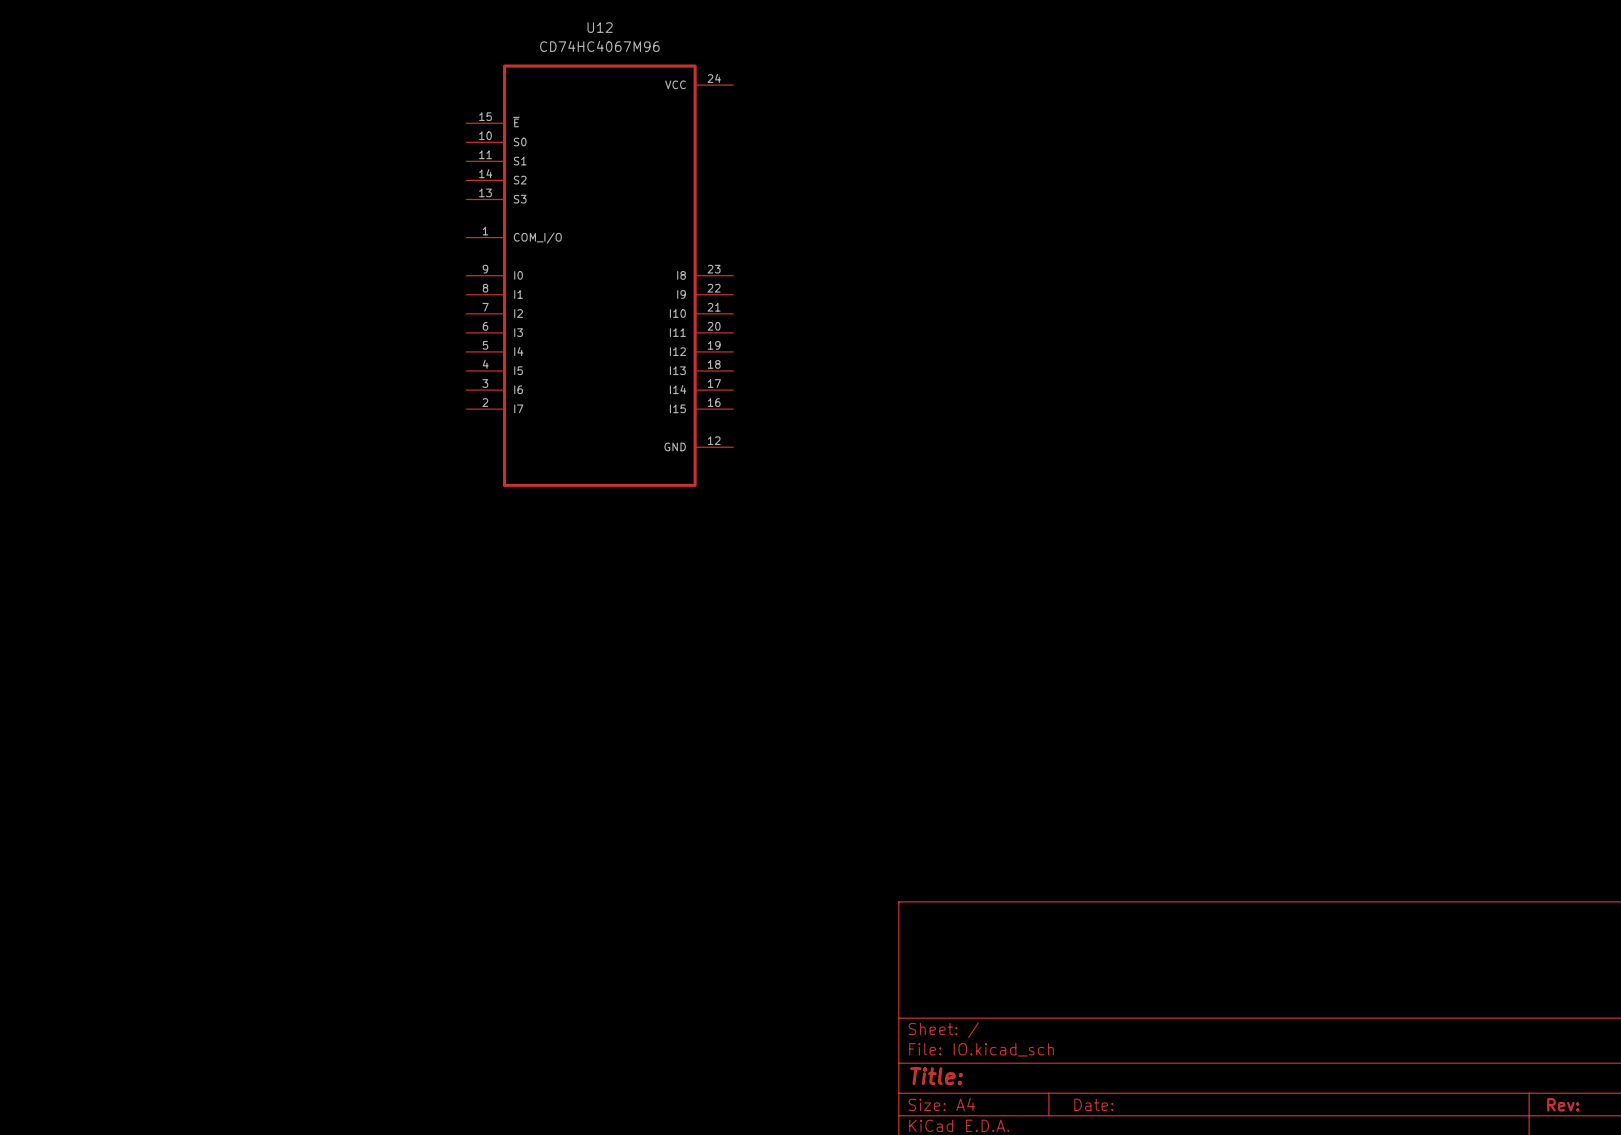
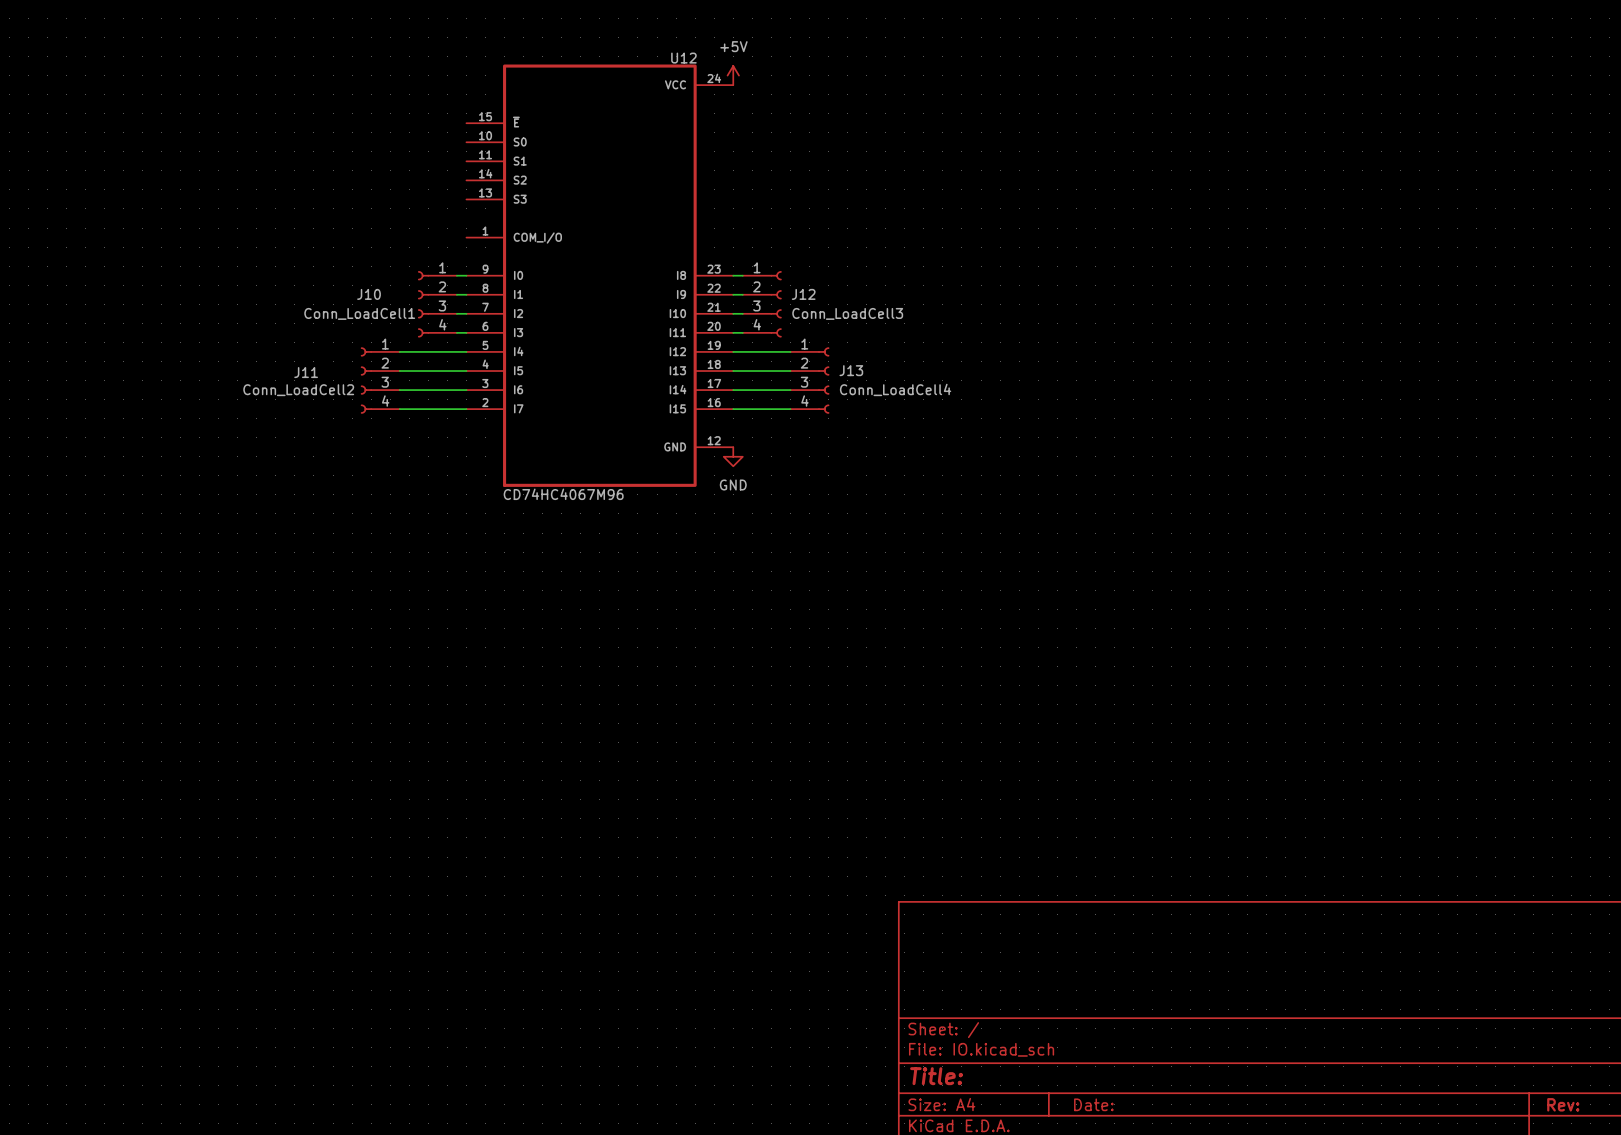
U12 name position: U12 (600, 27) -> U12 (683, 58)
U12 value position: CD74HC4067M96 (599, 46) -> CD74HC4067M96 (563, 494)
power symbol: none -> +5V (733, 75)
wire: none -> (456, 275) (466, 275)
wire: none -> (733, 275) (742, 275)
wire: none -> (456, 294) (466, 294)
wire: none -> (733, 294) (742, 294)
J10: none -> Conn_LoadCell1 (437, 304)
J12: none -> Conn_LoadCell3 (762, 304)
wire: none -> (456, 313) (466, 313)
wire: none -> (733, 313) (742, 313)
wire: none -> (456, 332) (466, 332)
wire: none -> (733, 332) (742, 332)
wire: none -> (399, 351) (466, 351)
wire: none -> (733, 351) (790, 351)
wire: none -> (399, 371) (466, 371)
wire: none -> (733, 371) (790, 371)
J11: none -> Conn_LoadCell2 (380, 380)
J13: none -> Conn_LoadCell4 (809, 380)
wire: none -> (399, 390) (466, 390)
wire: none -> (733, 390) (790, 390)
wire: none -> (399, 409) (466, 409)
wire: none -> (733, 409) (790, 409)
power symbol: none -> GND (733, 456)

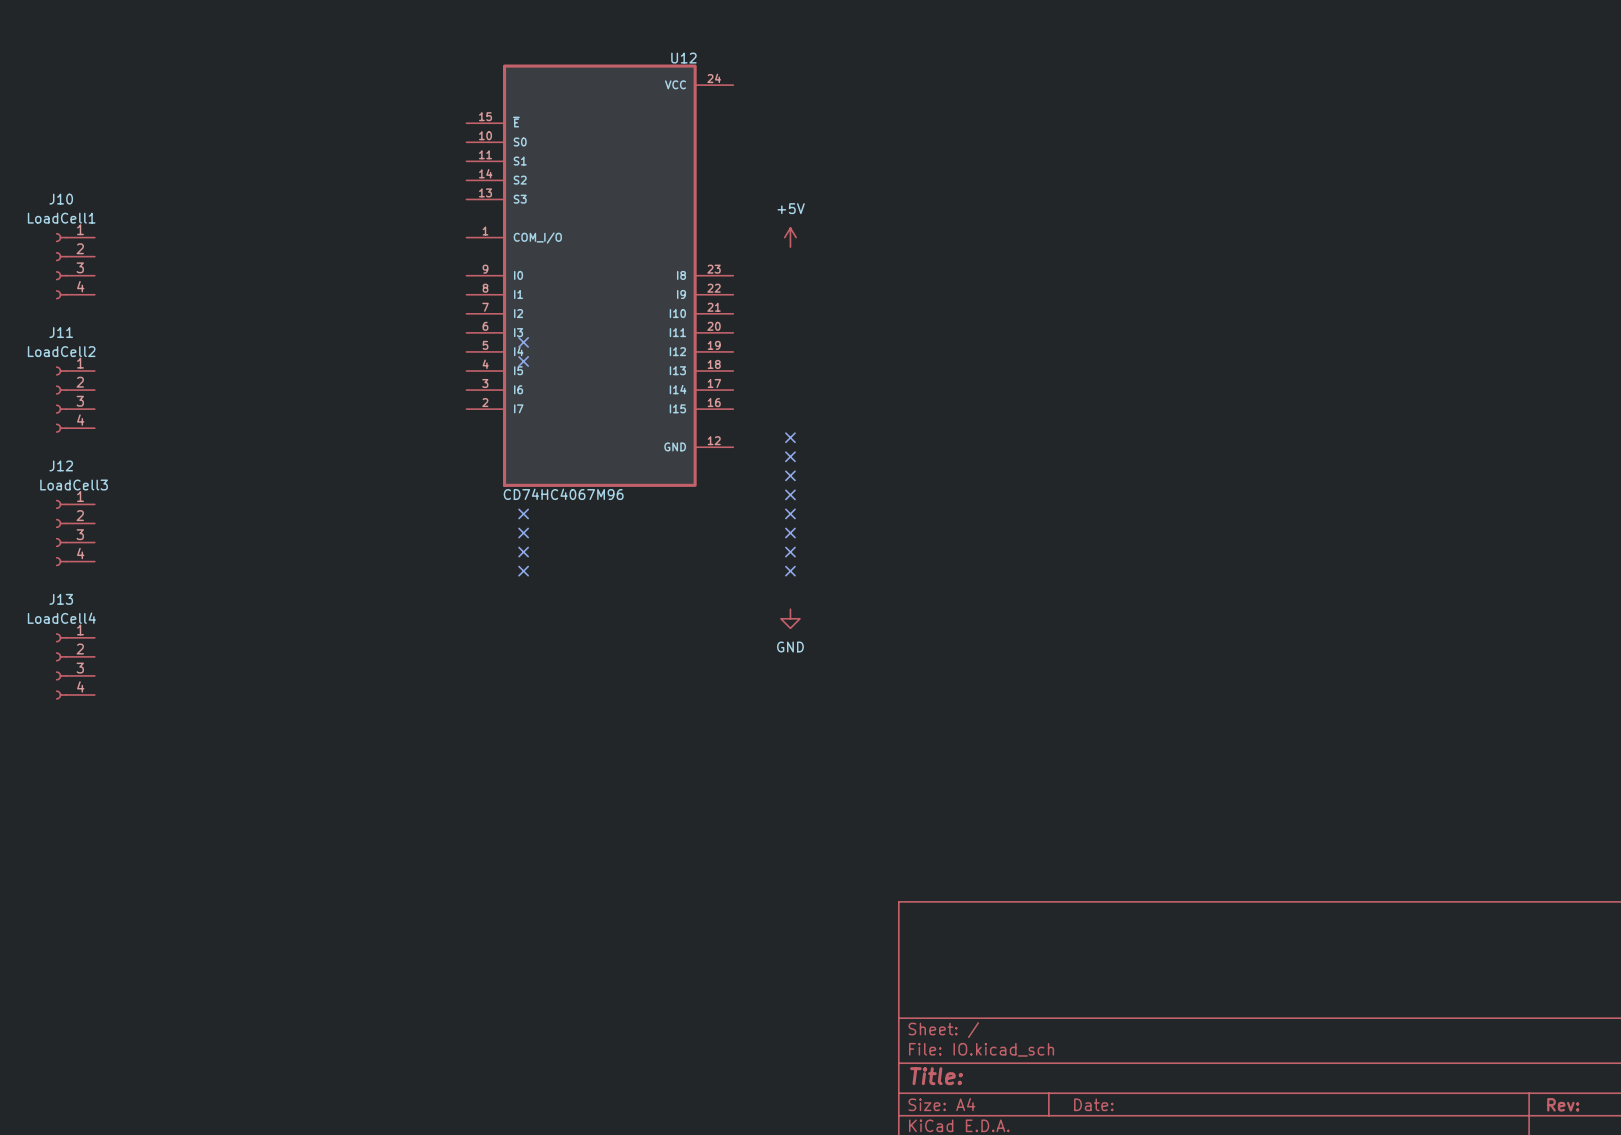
power symbol position: +5V (733, 75) -> +5V (790, 237)
wire: (456, 275) (466, 275) -> none
wire: (733, 275) (742, 275) -> none
J10 name position: J10 (369, 294) -> J10 (61, 199)
wire: (456, 294) (466, 294) -> none
wire: (733, 294) (742, 294) -> none
J12 name position: J12 (803, 294) -> J12 (61, 465)
J10 position: (437, 304) -> (75, 266)
J12 position: (762, 304) -> (75, 533)
J12 flip: as is (776, 304) -> left-right (61, 533)
J10 value: Conn_LoadCell1 (359, 313) -> LoadCell1 (61, 218)
wire: (456, 313) (466, 313) -> none
wire: (733, 313) (742, 313) -> none
J12 value: Conn_LoadCell3 (847, 313) -> LoadCell3 (74, 485)
wire: (456, 332) (466, 332) -> none
wire: (733, 332) (742, 332) -> none
no-connect mark: none -> (523, 342)
wire: (399, 351) (466, 351) -> none
wire: (733, 351) (790, 351) -> none
no-connect mark: none -> (523, 361)
J13 name position: J13 (851, 370) -> J13 (61, 599)
wire: (399, 371) (466, 371) -> none
wire: (733, 371) (790, 371) -> none
J11 name position: J11 (306, 372) -> J11 (61, 332)
J11 position: (380, 380) -> (75, 399)
J13 position: (809, 380) -> (75, 666)
J13 flip: as is (823, 380) -> left-right (61, 666)
J13 value: Conn_LoadCell4 (895, 389) -> LoadCell4 (61, 618)
J11 value: Conn_LoadCell2 (298, 390) -> LoadCell2 (61, 351)
wire: (399, 390) (466, 390) -> none
wire: (733, 390) (790, 390) -> none
wire: (399, 409) (466, 409) -> none
wire: (733, 409) (790, 409) -> none
no-connect mark: none -> (790, 437)
power symbol position: GND (733, 456) -> GND (790, 618)
no-connect mark: none -> (790, 456)
no-connect mark: none -> (790, 475)
no-connect mark: none -> (790, 494)
no-connect mark: none -> (523, 513)
no-connect mark: none -> (790, 513)
no-connect mark: none -> (523, 533)
no-connect mark: none -> (790, 533)
no-connect mark: none -> (523, 552)
no-connect mark: none -> (790, 552)
no-connect mark: none -> (523, 571)
no-connect mark: none -> (790, 571)

